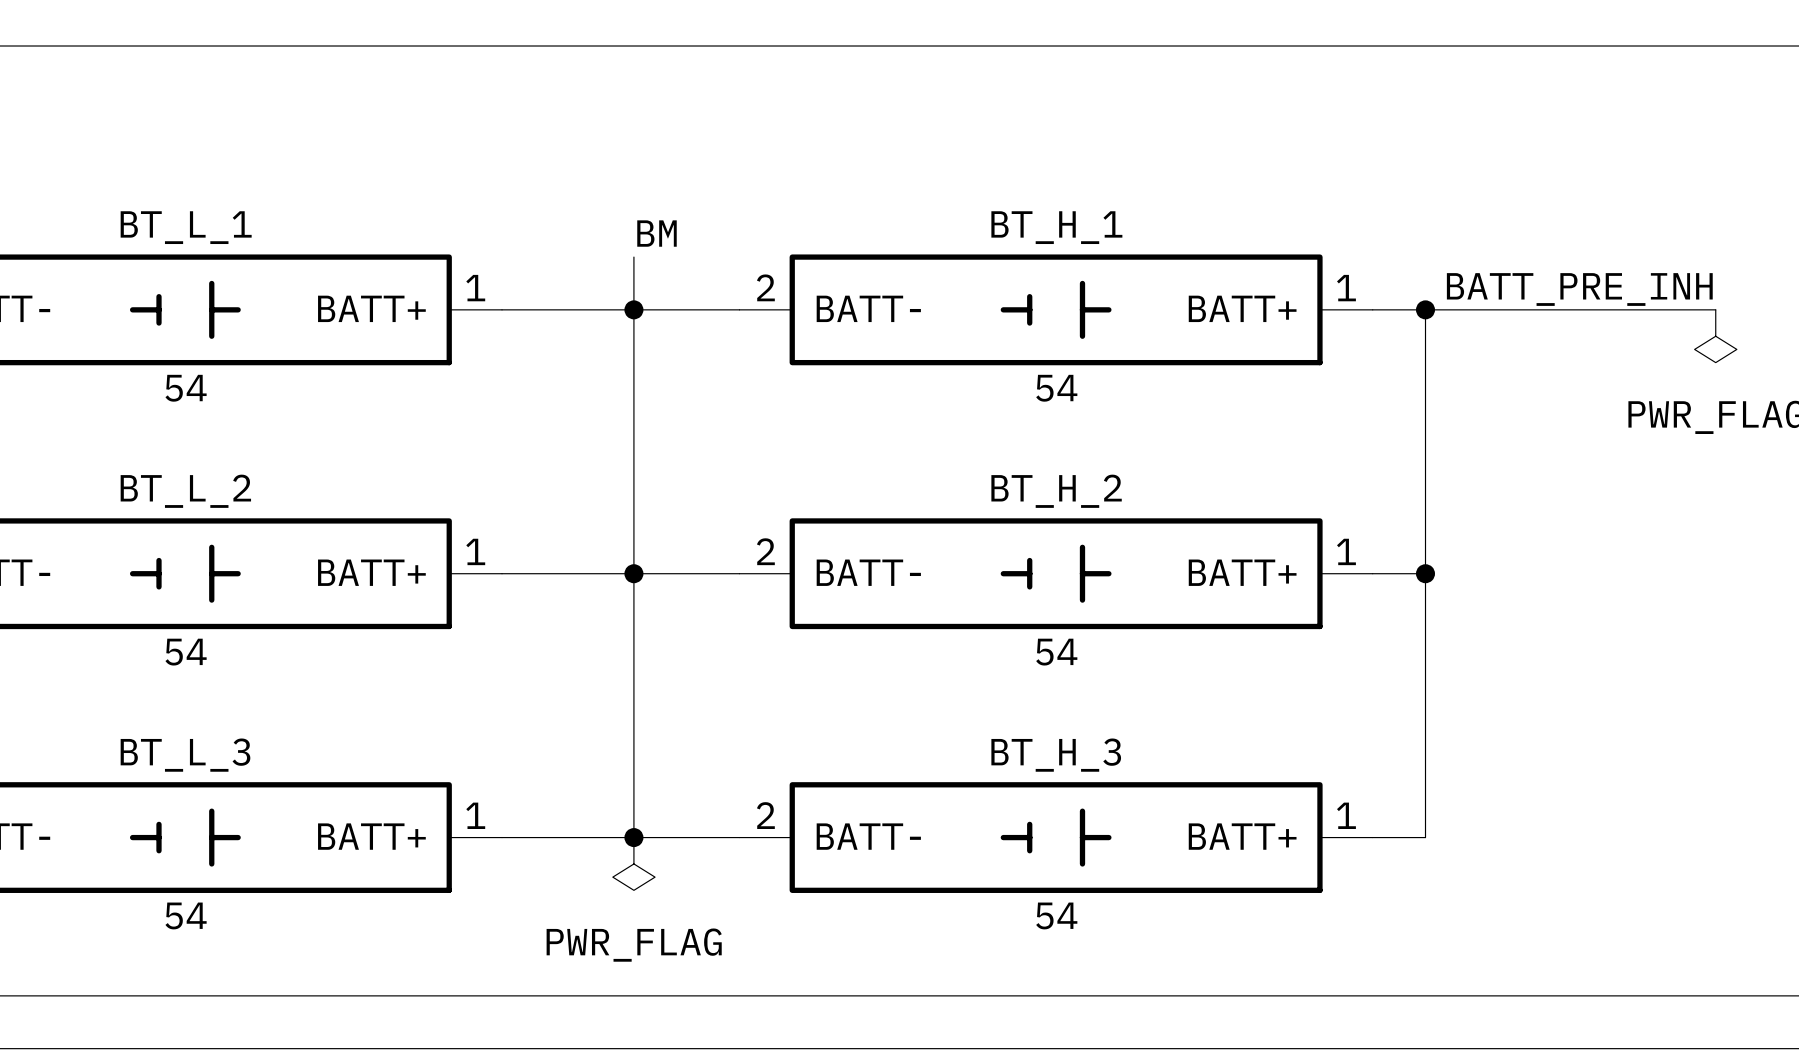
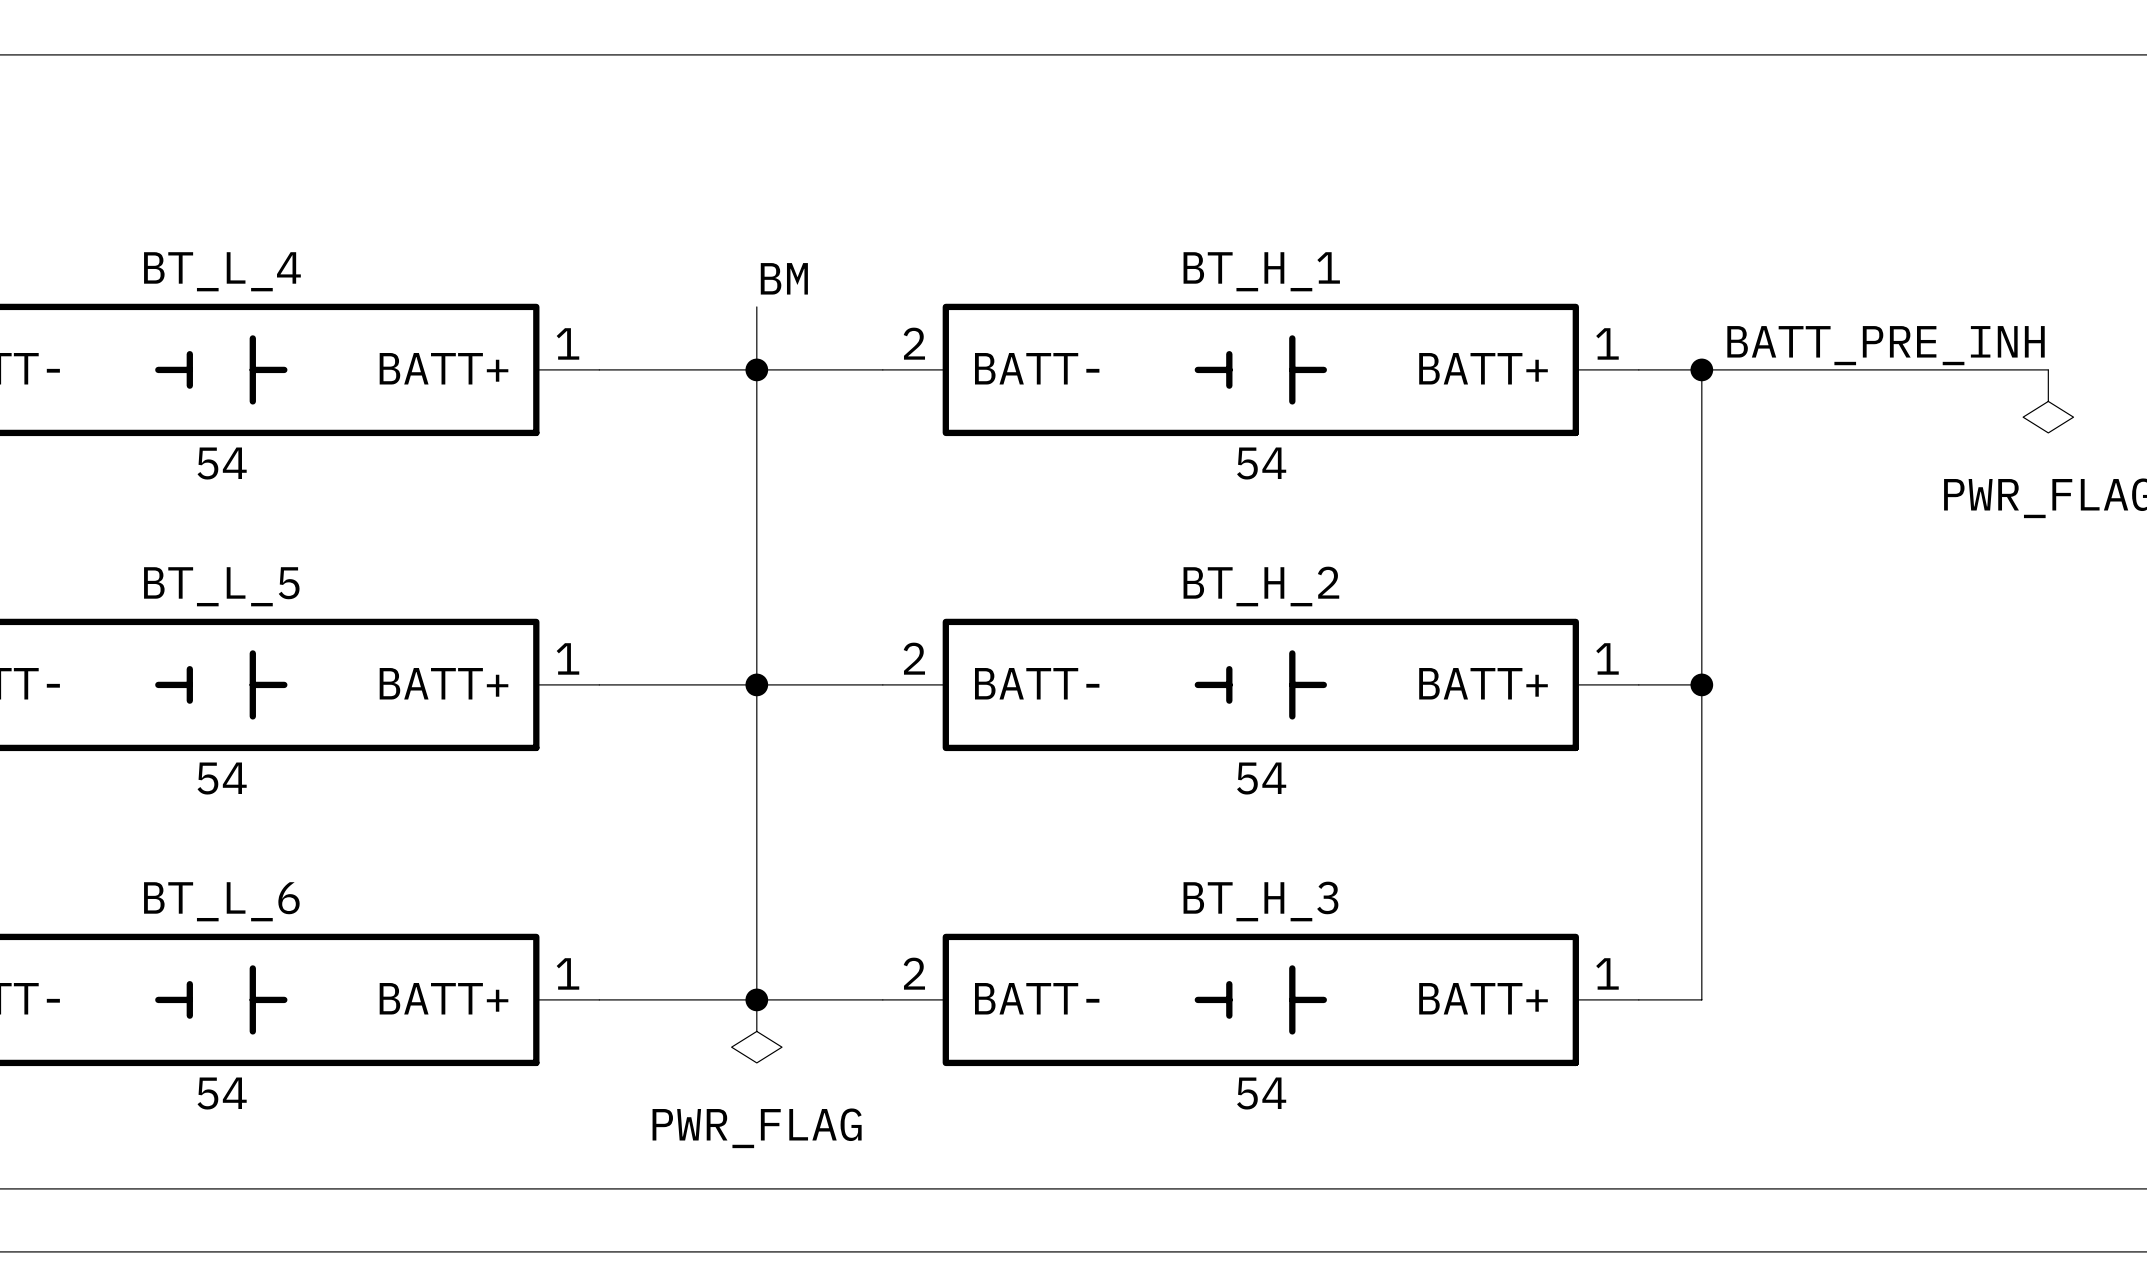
BT_L_1 name: BT_L_1 (186, 227) -> BT_L_4 (222, 271)
BT_L_2 name: BT_L_2 (185, 491) -> BT_L_5 (221, 586)
BT_L_3 name: BT_L_3 (185, 755) -> BT_L_6 (221, 901)

